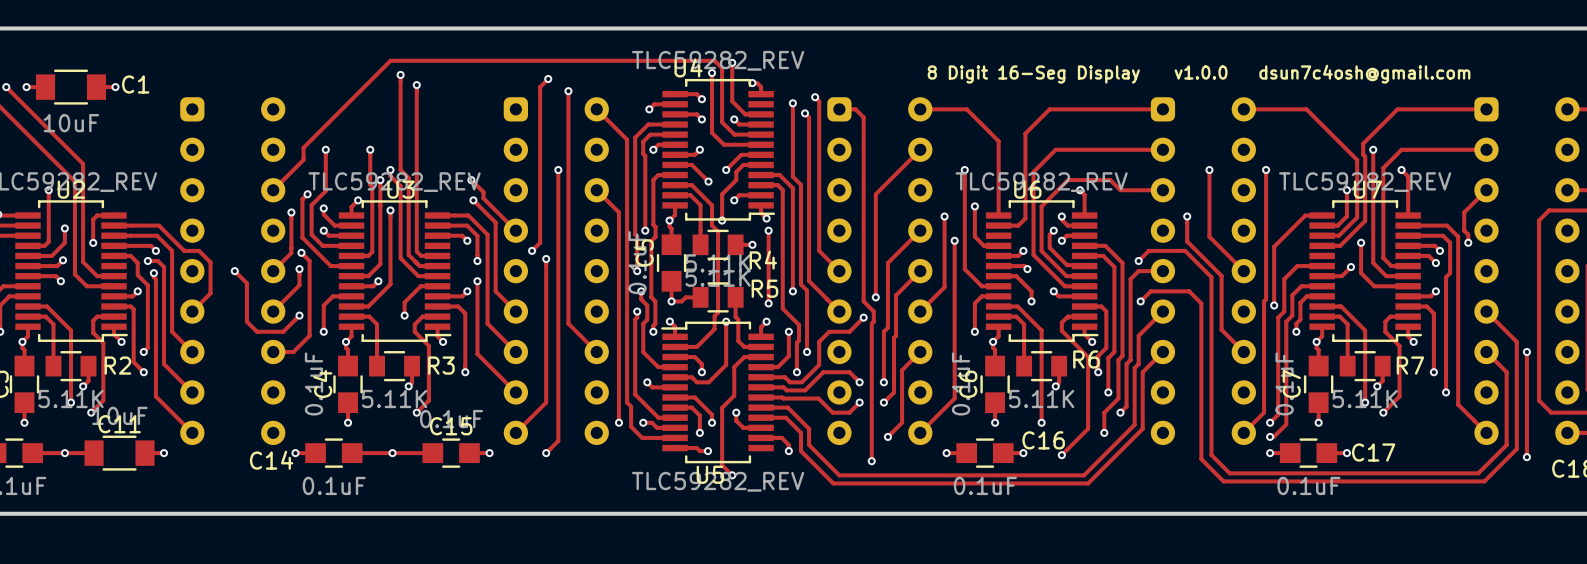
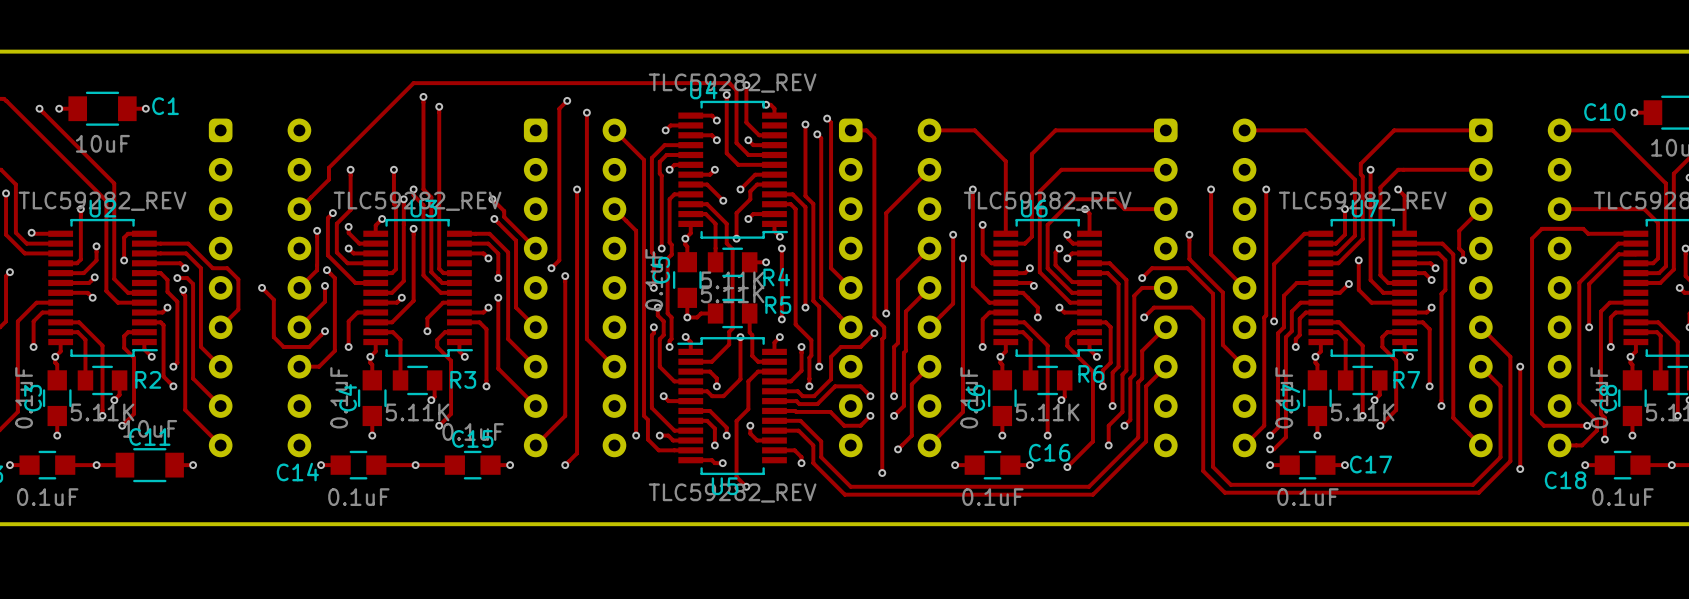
text: v1.0.0 (1201, 72) -> none
text: 8 Digit 16-Seg Display (1033, 74) -> none
text: dsun7c4osh@gmail.com (1364, 74) -> none

